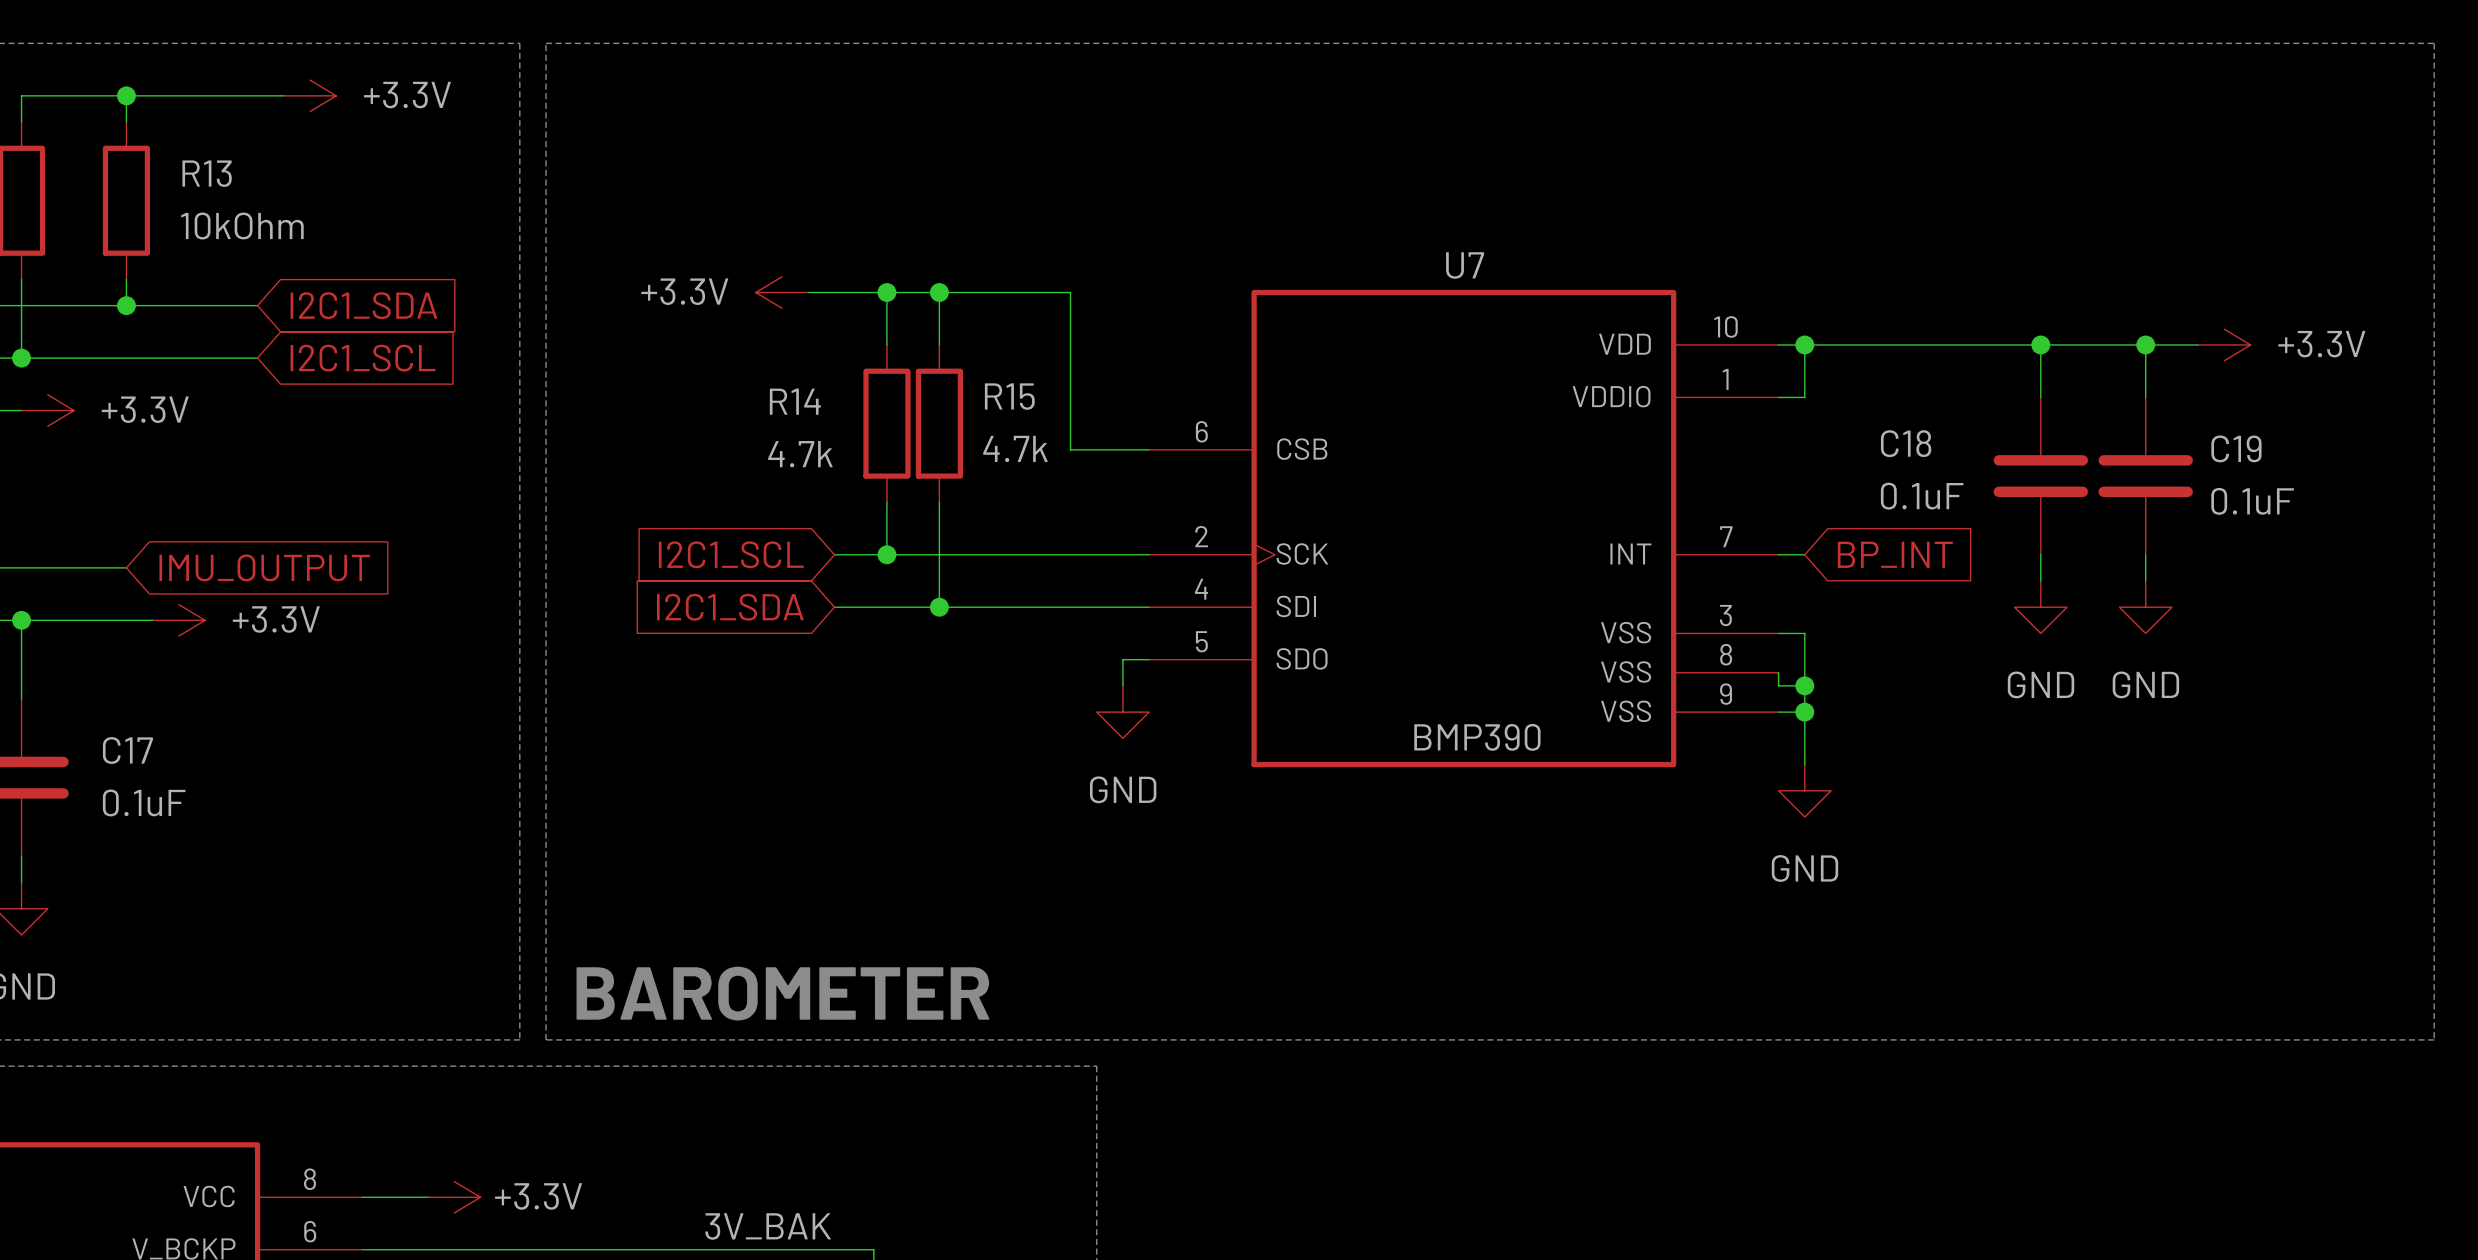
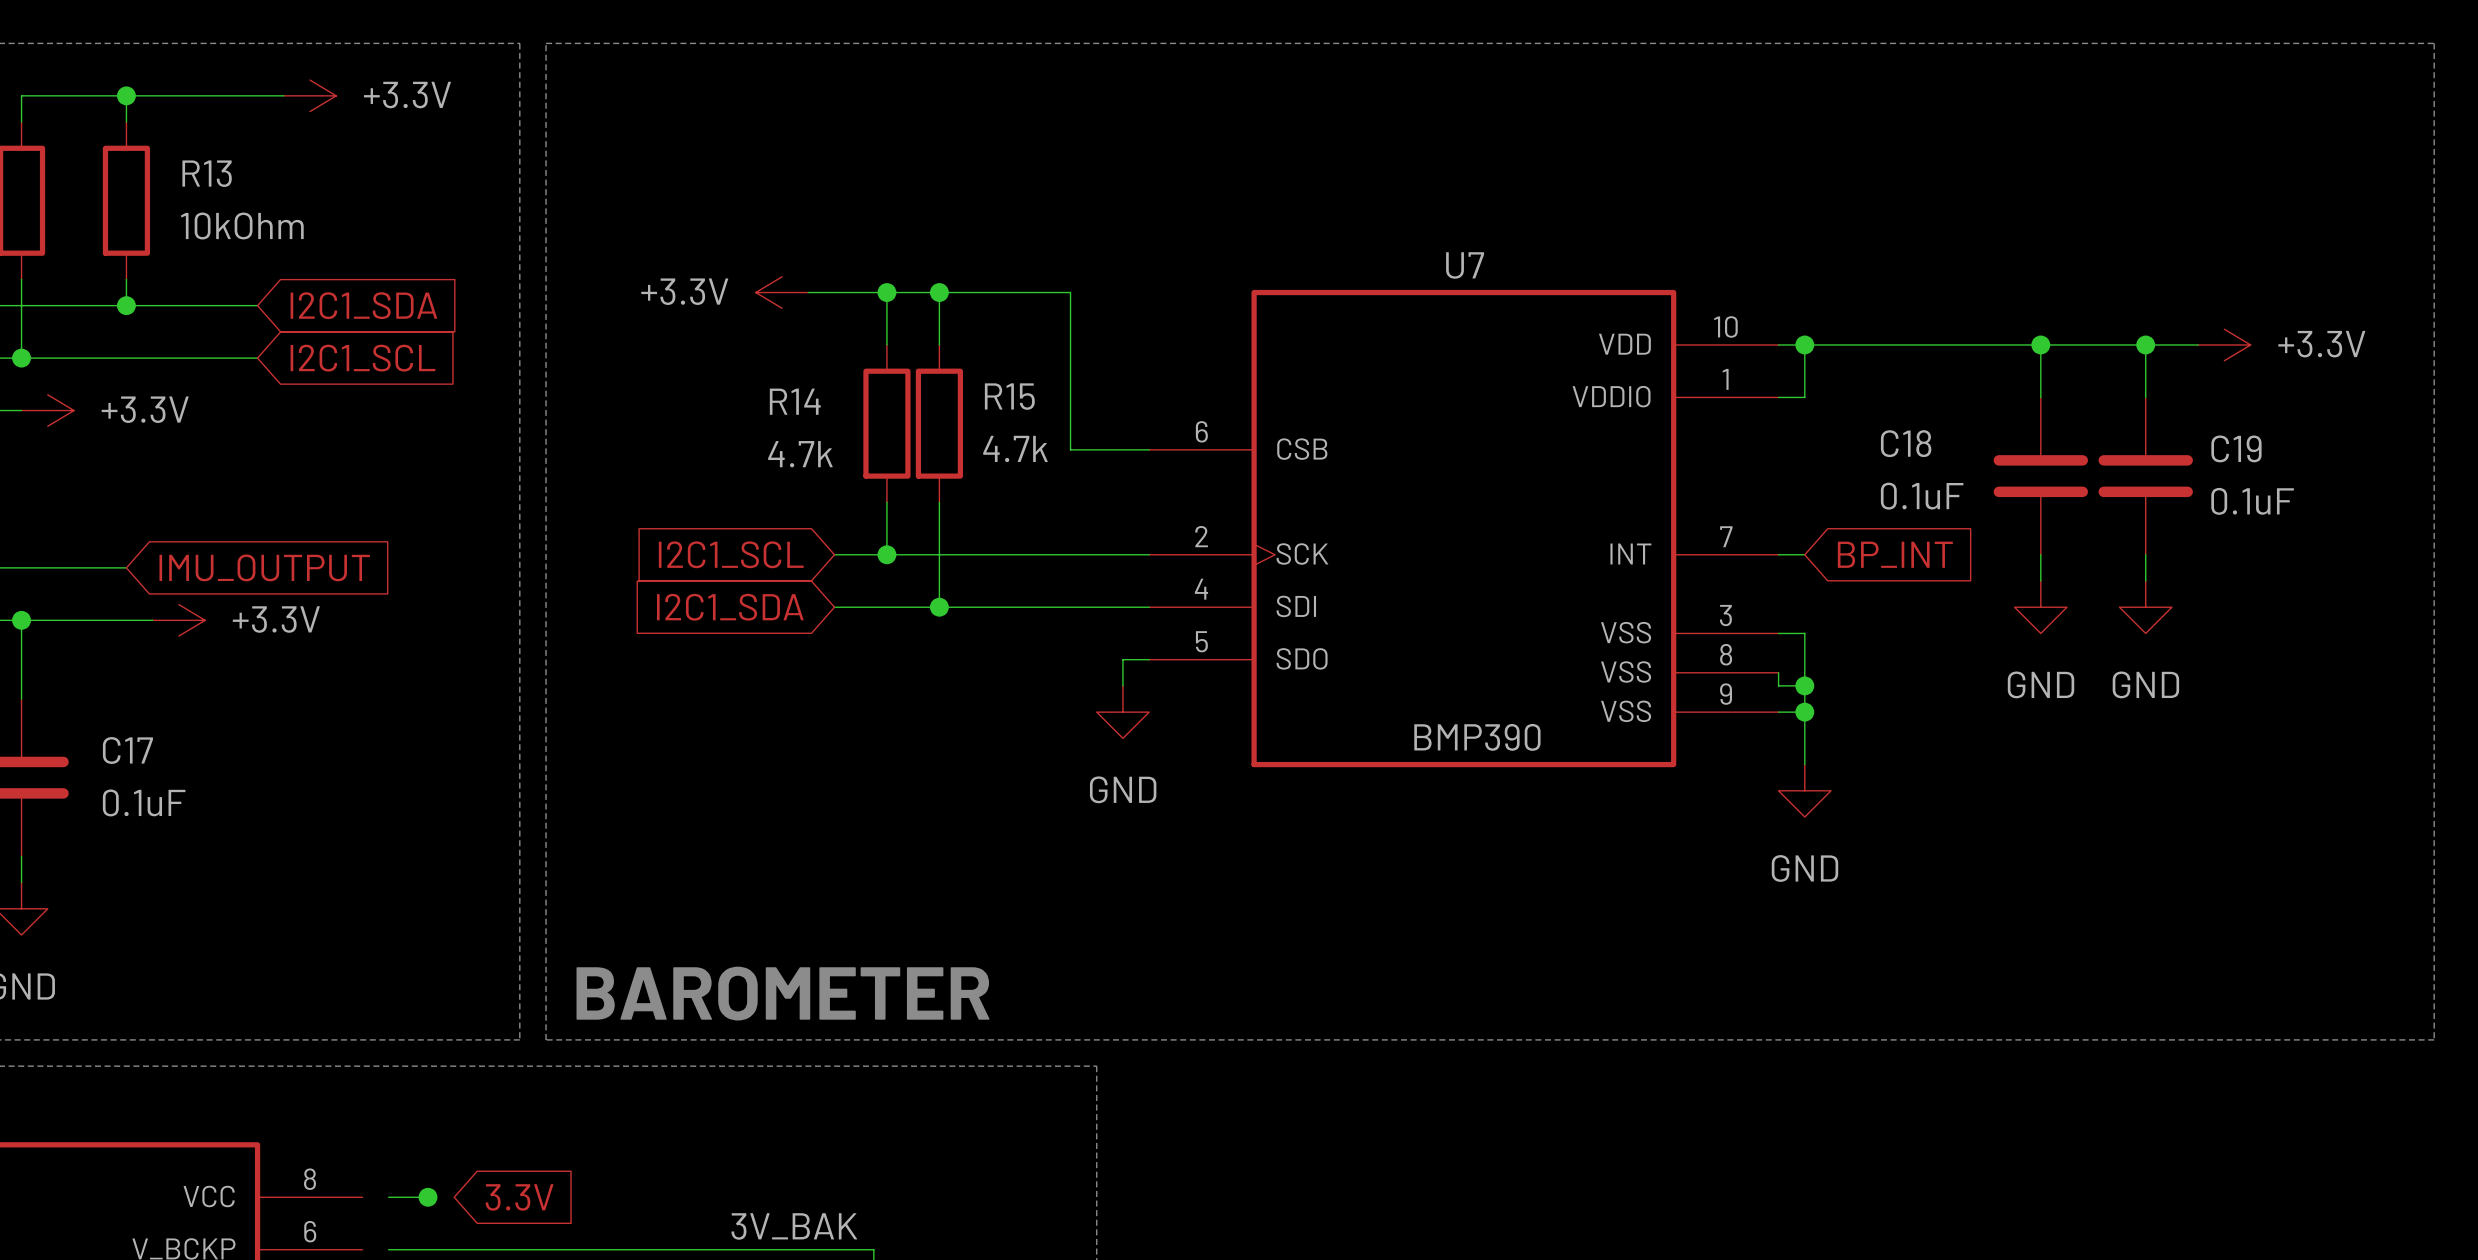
wire: (362, 1197) (388, 1197) -> none
junction: none -> (428, 1197)
power symbol: +3.3V (454, 1197) -> none
global label: none -> 3.3V (519, 1197)
label position: 3V_BAK (768, 1226) -> 3V_BAK (794, 1226)
wire: (362, 1249) (388, 1249) -> none

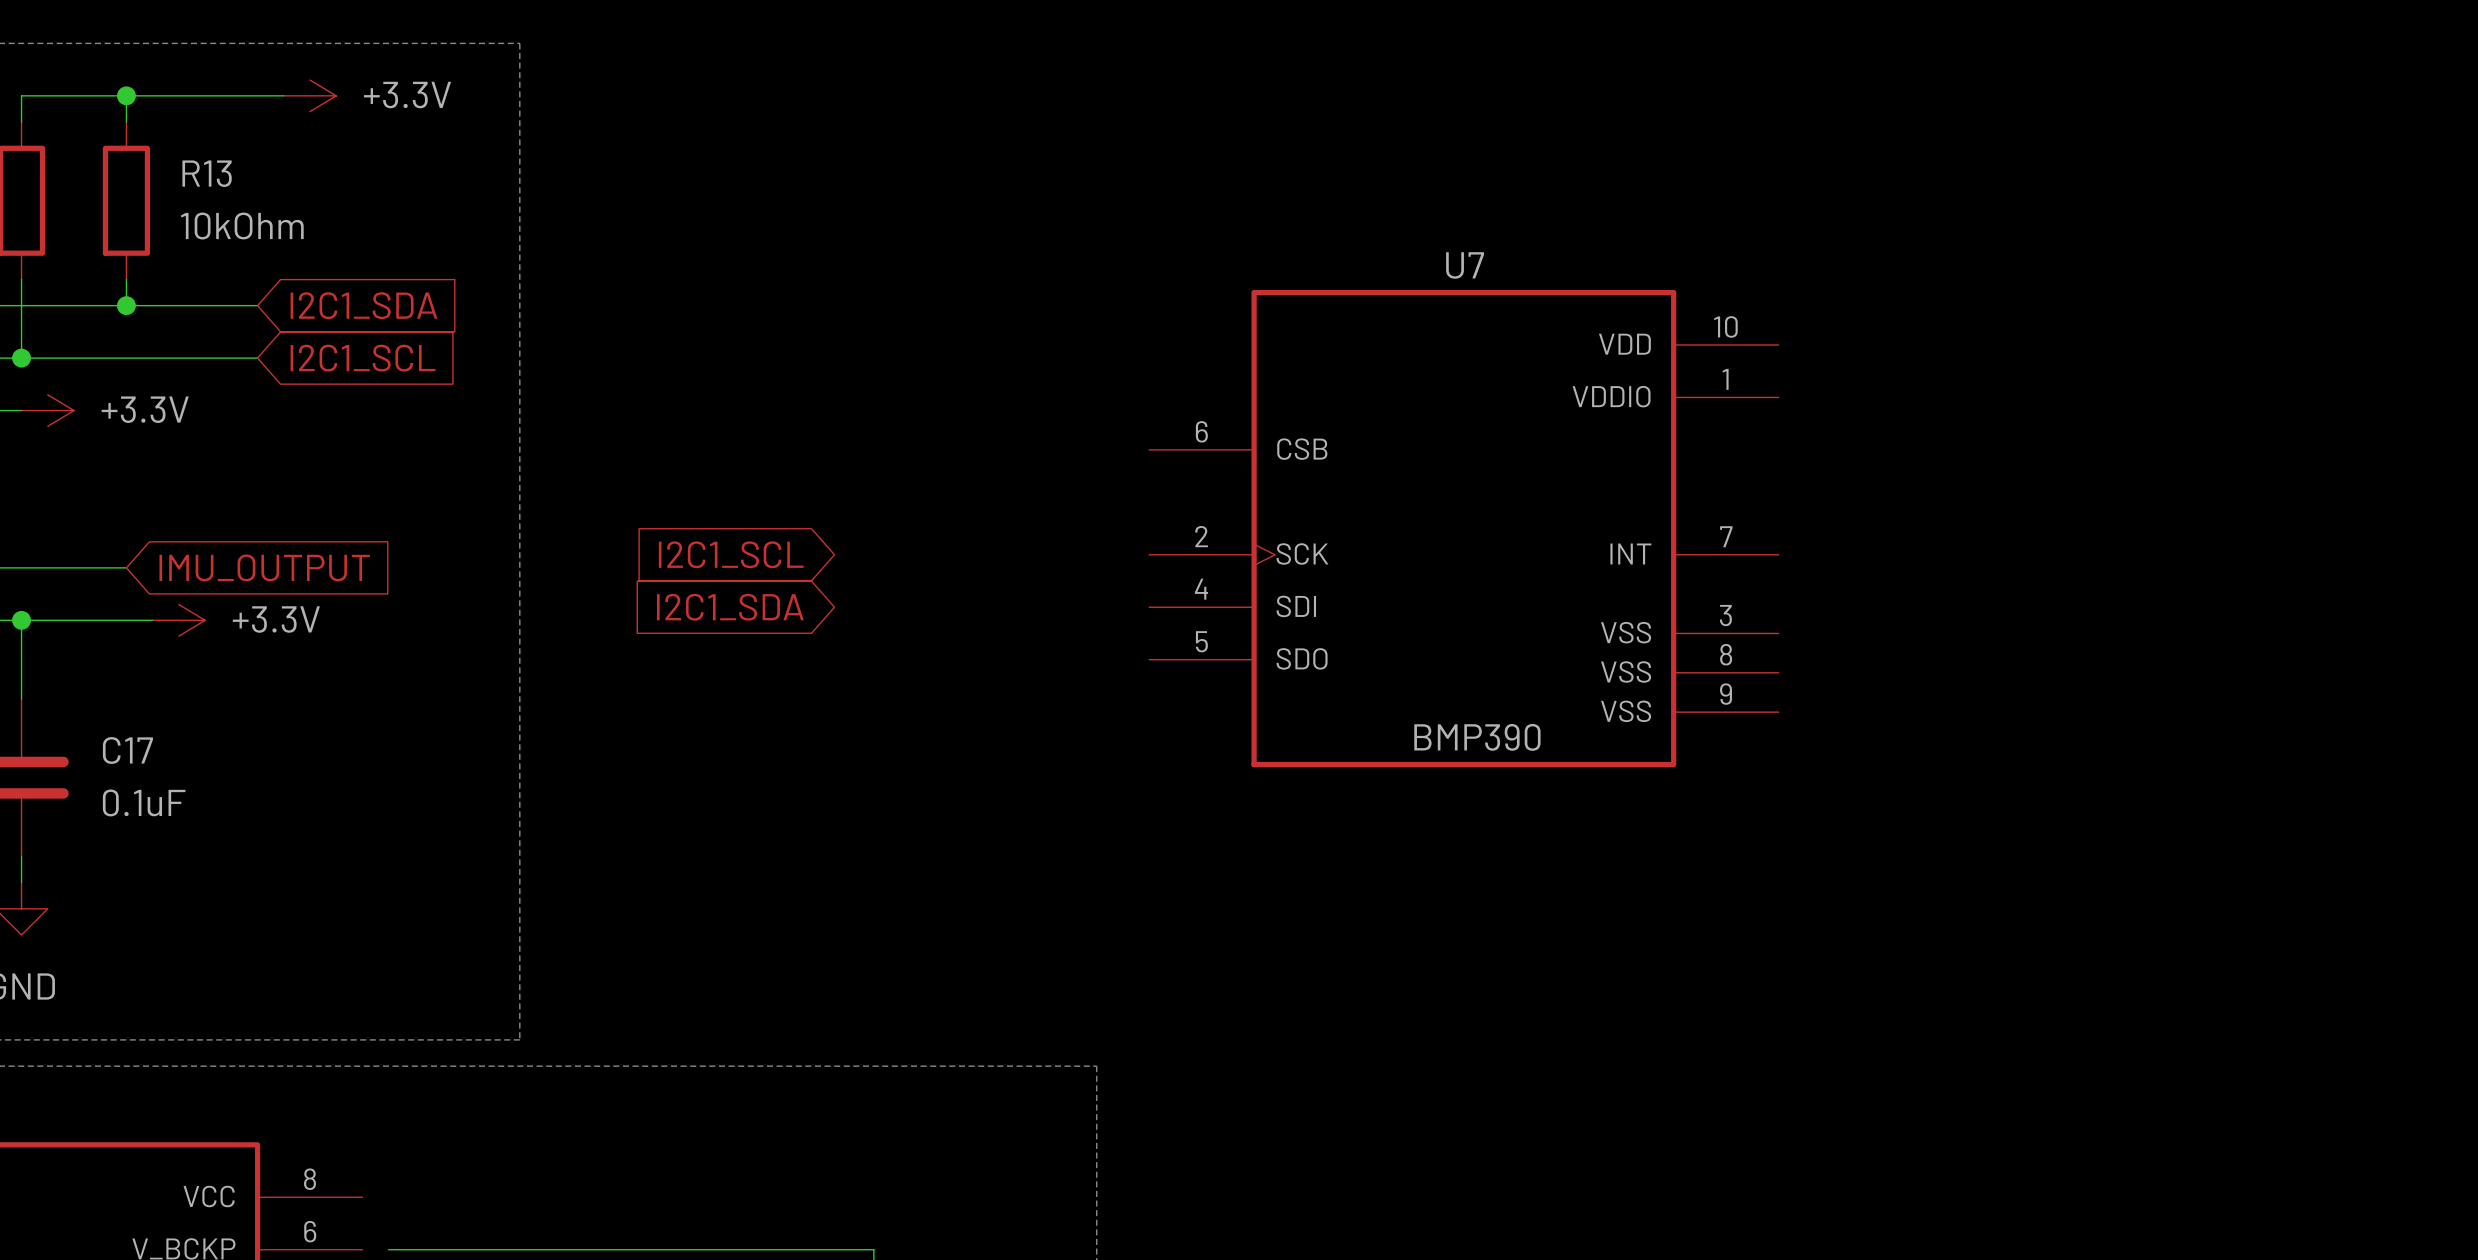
line: (546, 43) (2434, 43) (2434, 1039) (546, 1039) (546, 43) -> none
power symbol: +3.3V (782, 292) -> none
wire: (808, 292) (1070, 292) (1070, 449) (1149, 449) -> none
wire: (886, 292) (886, 344) -> none
junction: (886, 292) -> none
wire: (939, 292) (939, 344) -> none
junction: (939, 292) -> none
wire: (1778, 344) (2198, 344) -> none
wire: (1804, 344) (1804, 397) (1778, 397) -> none
junction: (1804, 344) -> none
wire: (2040, 344) (2040, 397) -> none
junction: (2040, 344) -> none
wire: (2145, 344) (2145, 397) -> none
junction: (2145, 344) -> none
power symbol: +3.3V (2224, 344) -> none
R14: 4.7k (886, 423) -> none
R15: 4.7k (939, 423) -> none
C18: 0.1uF (2040, 476) -> none
C19: 0.1uF (2145, 476) -> none
wire: (886, 502) (886, 554) -> none
wire: (939, 502) (939, 607) -> none
wire: (834, 554) (1149, 554) -> none
junction: (886, 554) -> none
wire: (1778, 554) (1804, 554) -> none
global label: BP_INT (1895, 554) -> none
wire: (2040, 554) (2040, 581) -> none
wire: (2145, 554) (2145, 581) -> none
wire: (834, 607) (1149, 607) -> none
junction: (939, 607) -> none
power symbol: GND (2040, 607) -> none
power symbol: GND (2145, 607) -> none
wire: (1778, 633) (1804, 633) (1804, 764) -> none
wire: (1149, 659) (1122, 659) (1122, 685) -> none
wire: (1778, 672) (1778, 685) (1804, 685) -> none
junction: (1804, 685) -> none
power symbol: GND (1122, 712) -> none
wire: (1778, 712) (1804, 712) -> none
junction: (1804, 712) -> none
power symbol: GND (1804, 790) -> none
text: BAROMETER (783, 993) -> none
wire: (388, 1197) (428, 1197) -> none
junction: (428, 1197) -> none
global label: 3.3V (519, 1197) -> none
label: 3V_BAK (794, 1226) -> none

